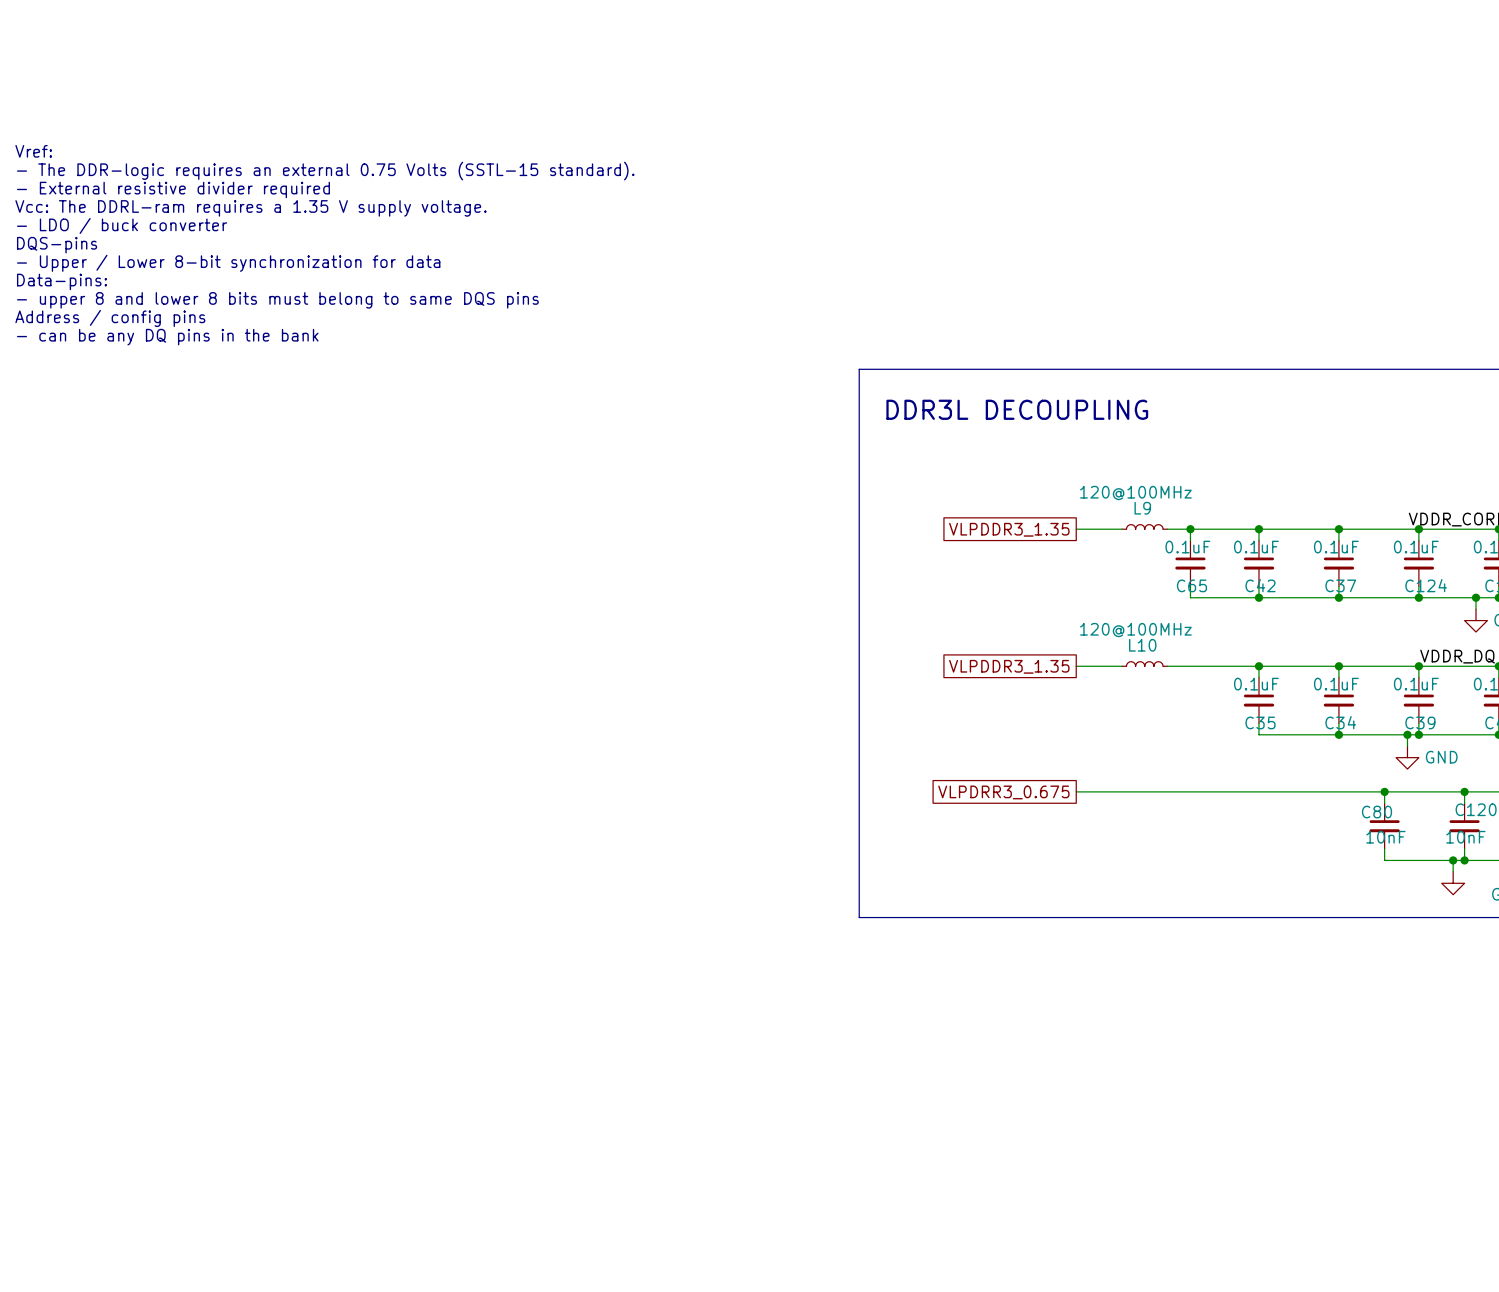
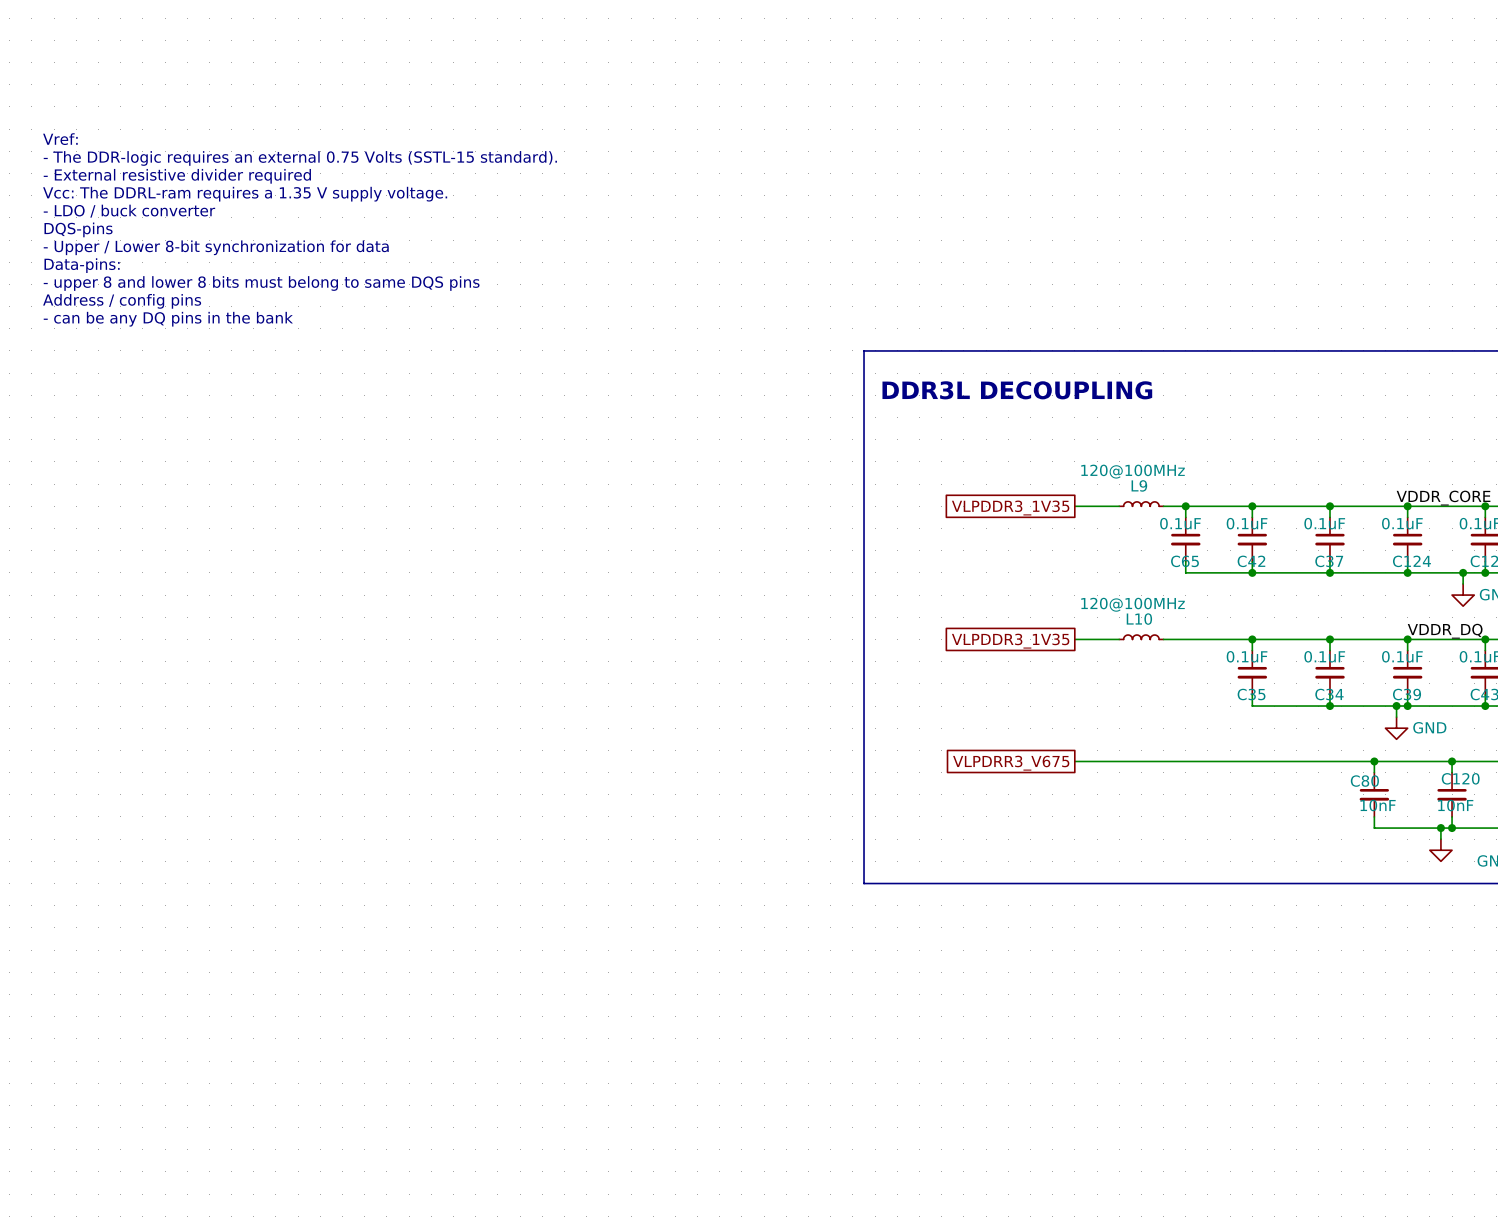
global label: VLPDDR3_1.35 (1009, 529) -> VLPDDR3_1V35 (1010, 508)
global label: VLPDDR3_1.35 (1009, 666) -> VLPDDR3_1V35 (1010, 641)
global label: VLPDRR3_0.675 (1003, 792) -> VLPDRR3_V675 (1011, 763)

